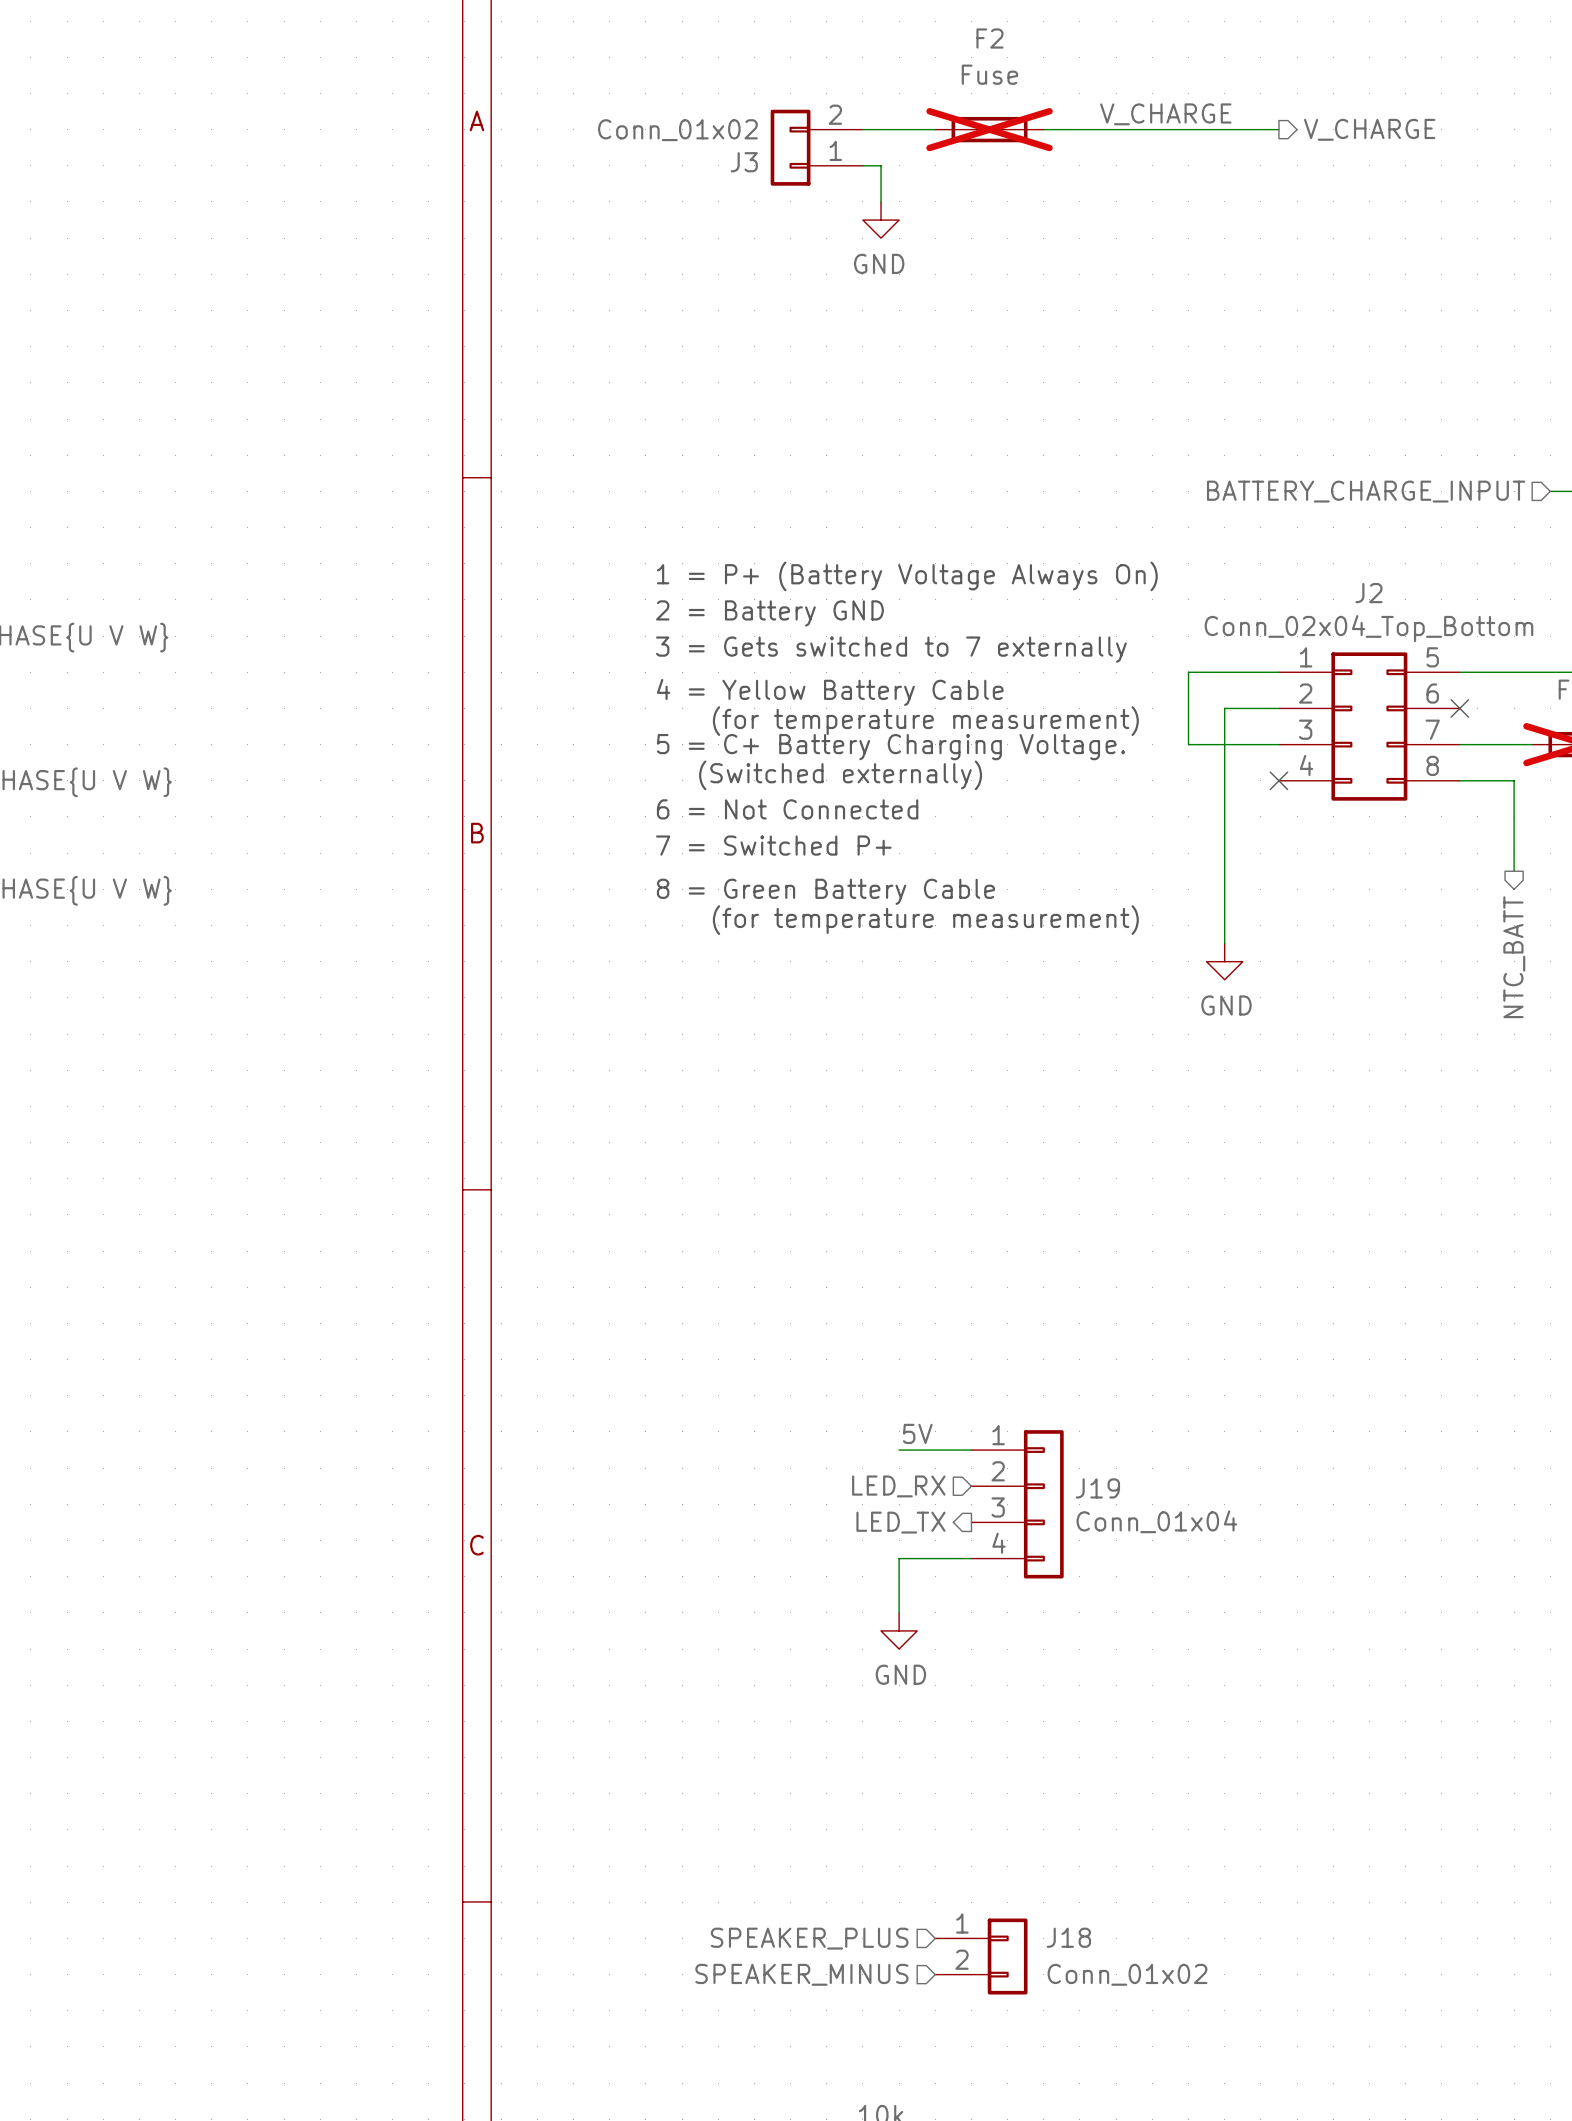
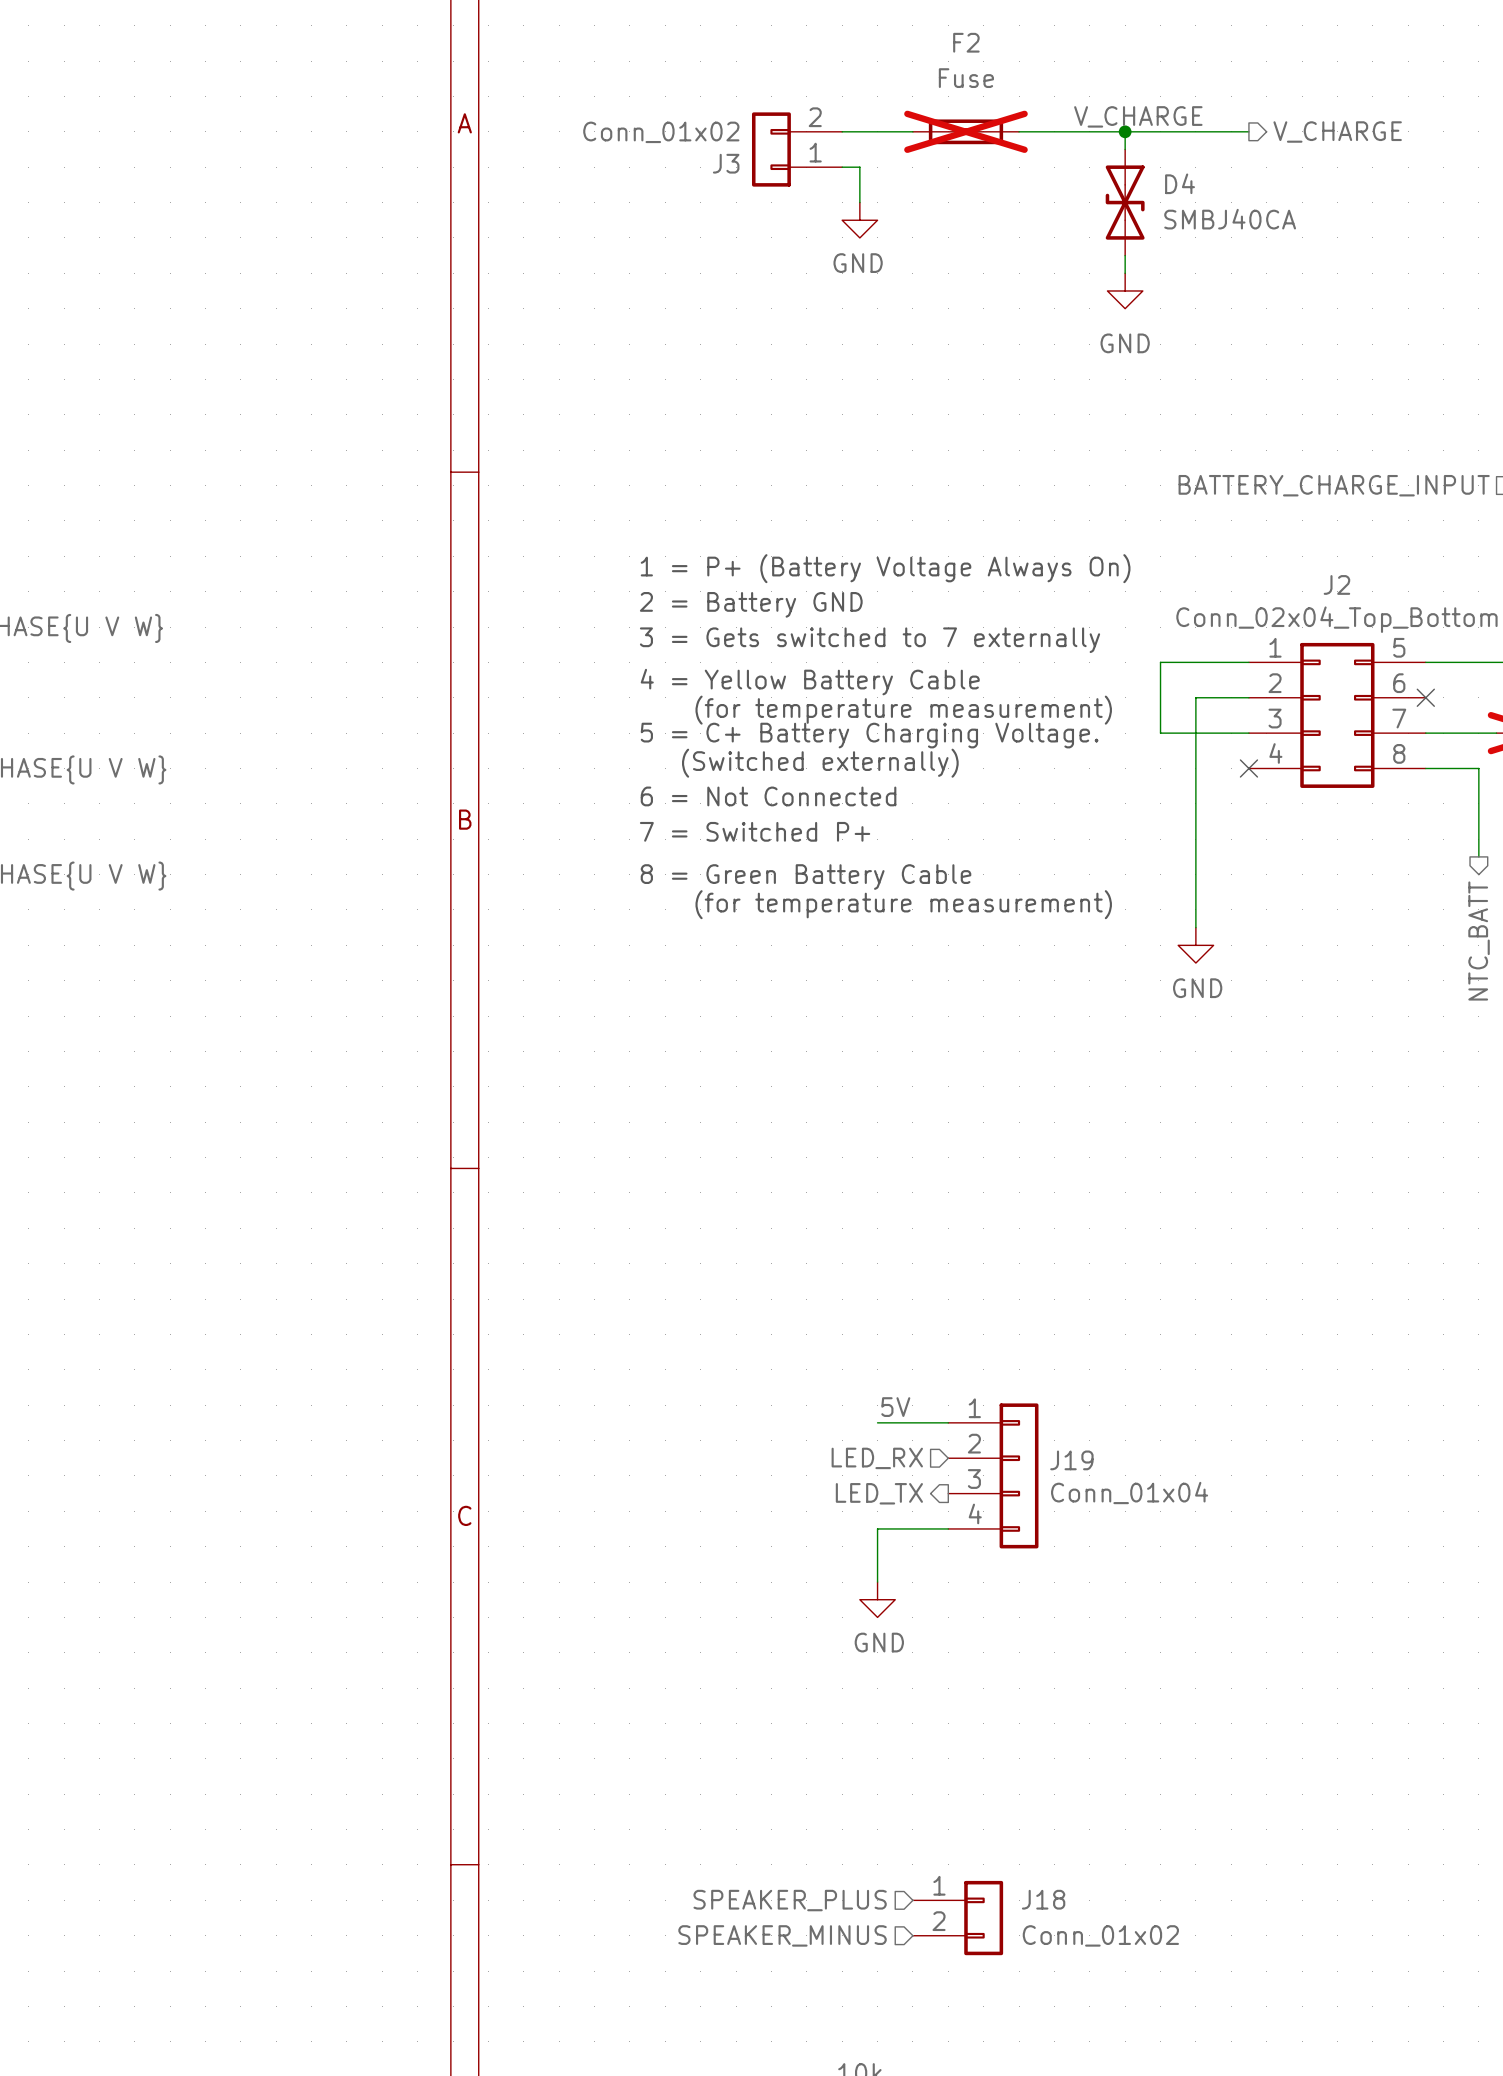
wire: none -> (1125, 131) (1125, 149)
junction: none -> (1125, 131)
D4: none -> SMBJ40CA (1125, 202)
wire: none -> (1125, 255) (1125, 273)
power symbol: none -> GND (1125, 290)

